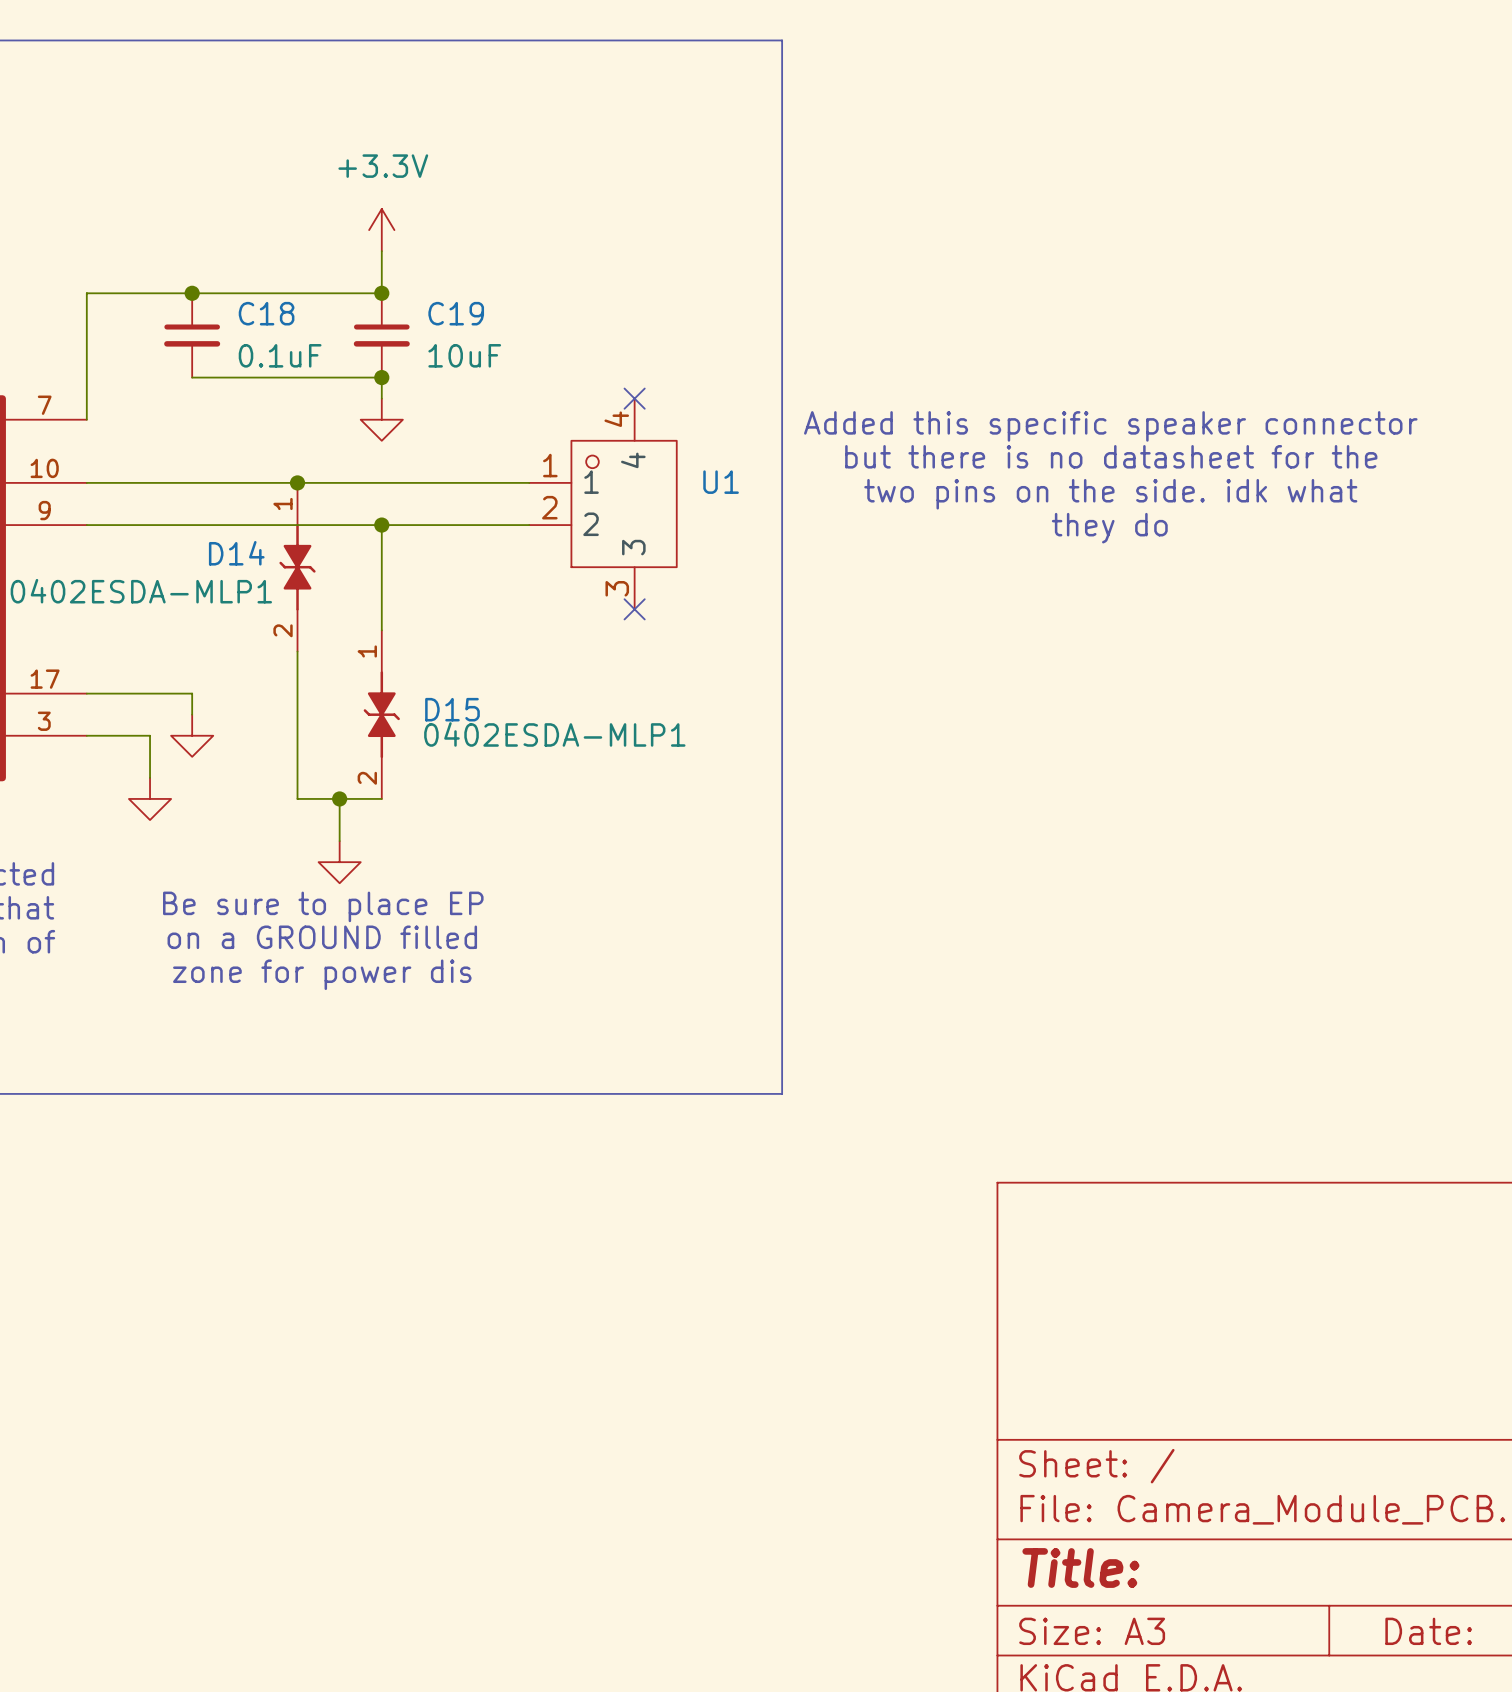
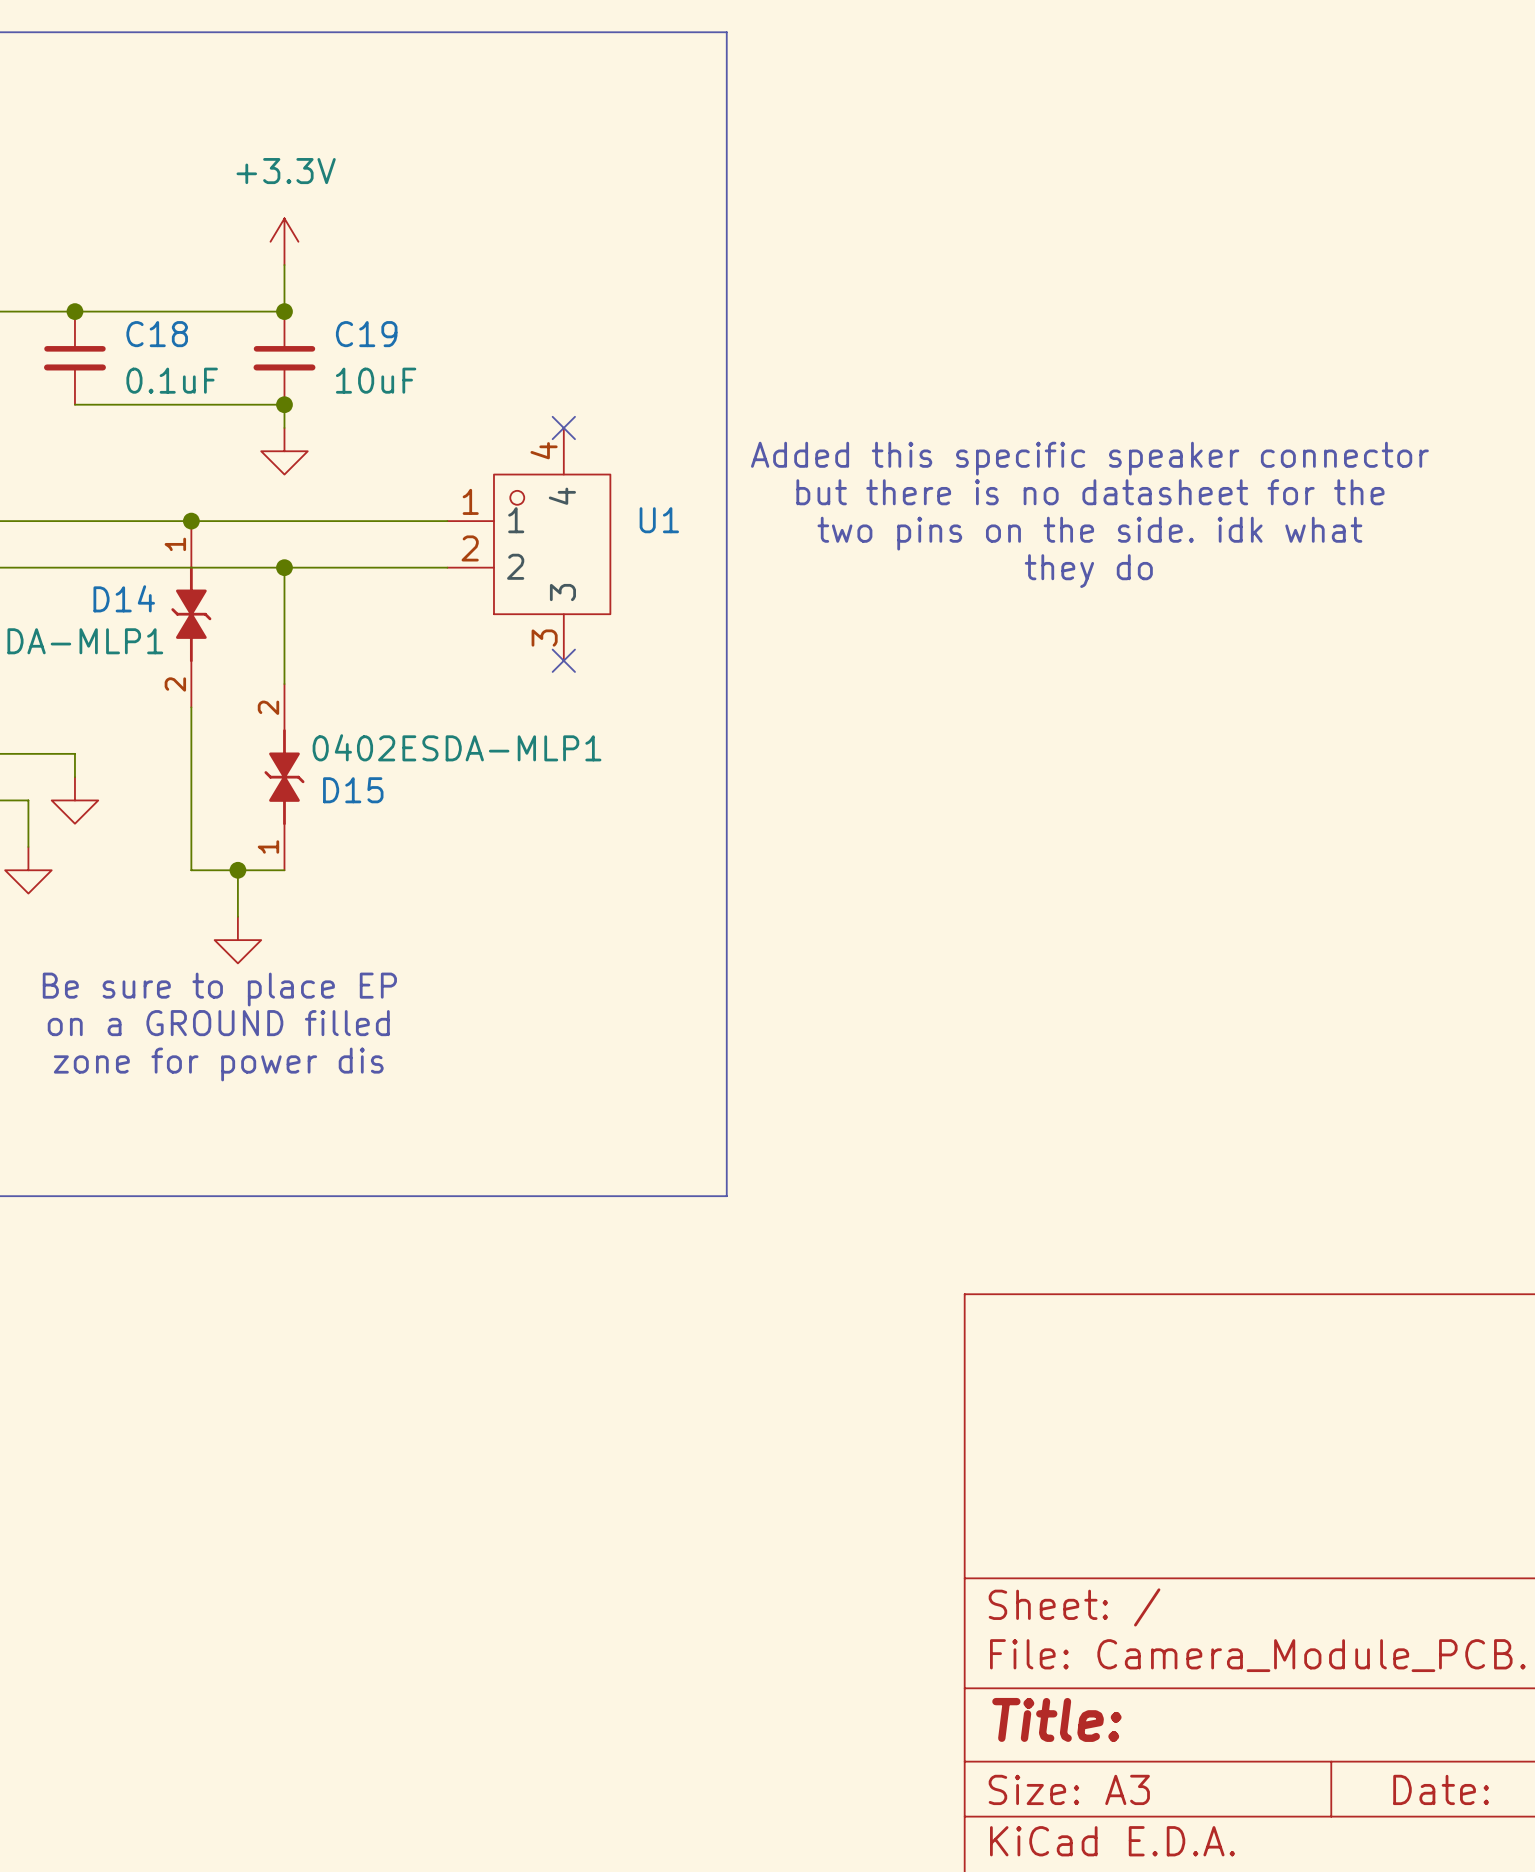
D15 rotation: 0° (381, 714) -> 180° (284, 777)
D15 value position: 0402ESDA-MLP1 (554, 734) -> 0402ESDA-MLP1 (457, 747)

